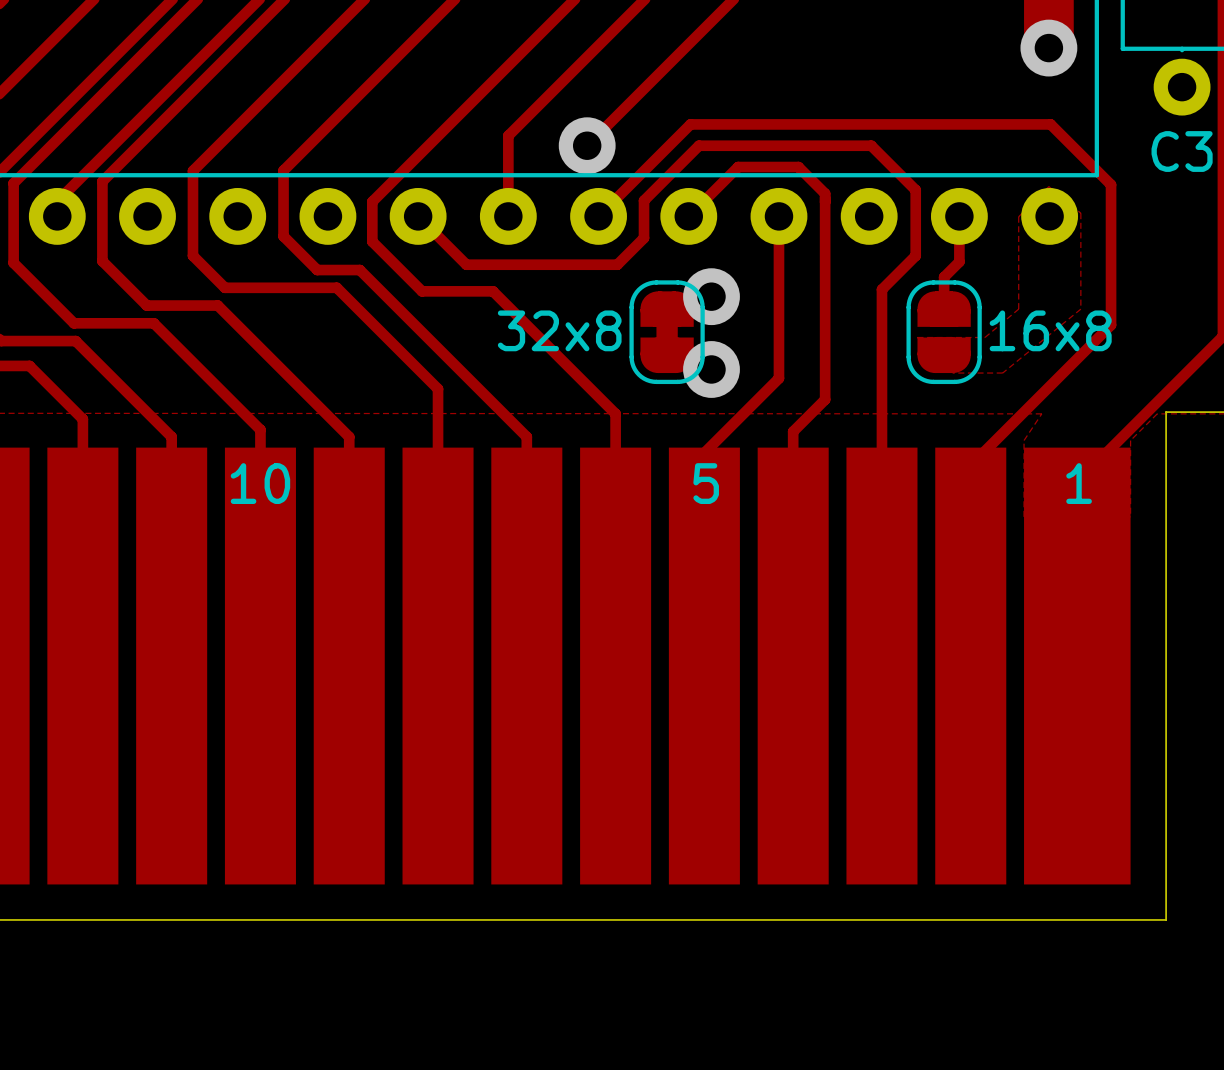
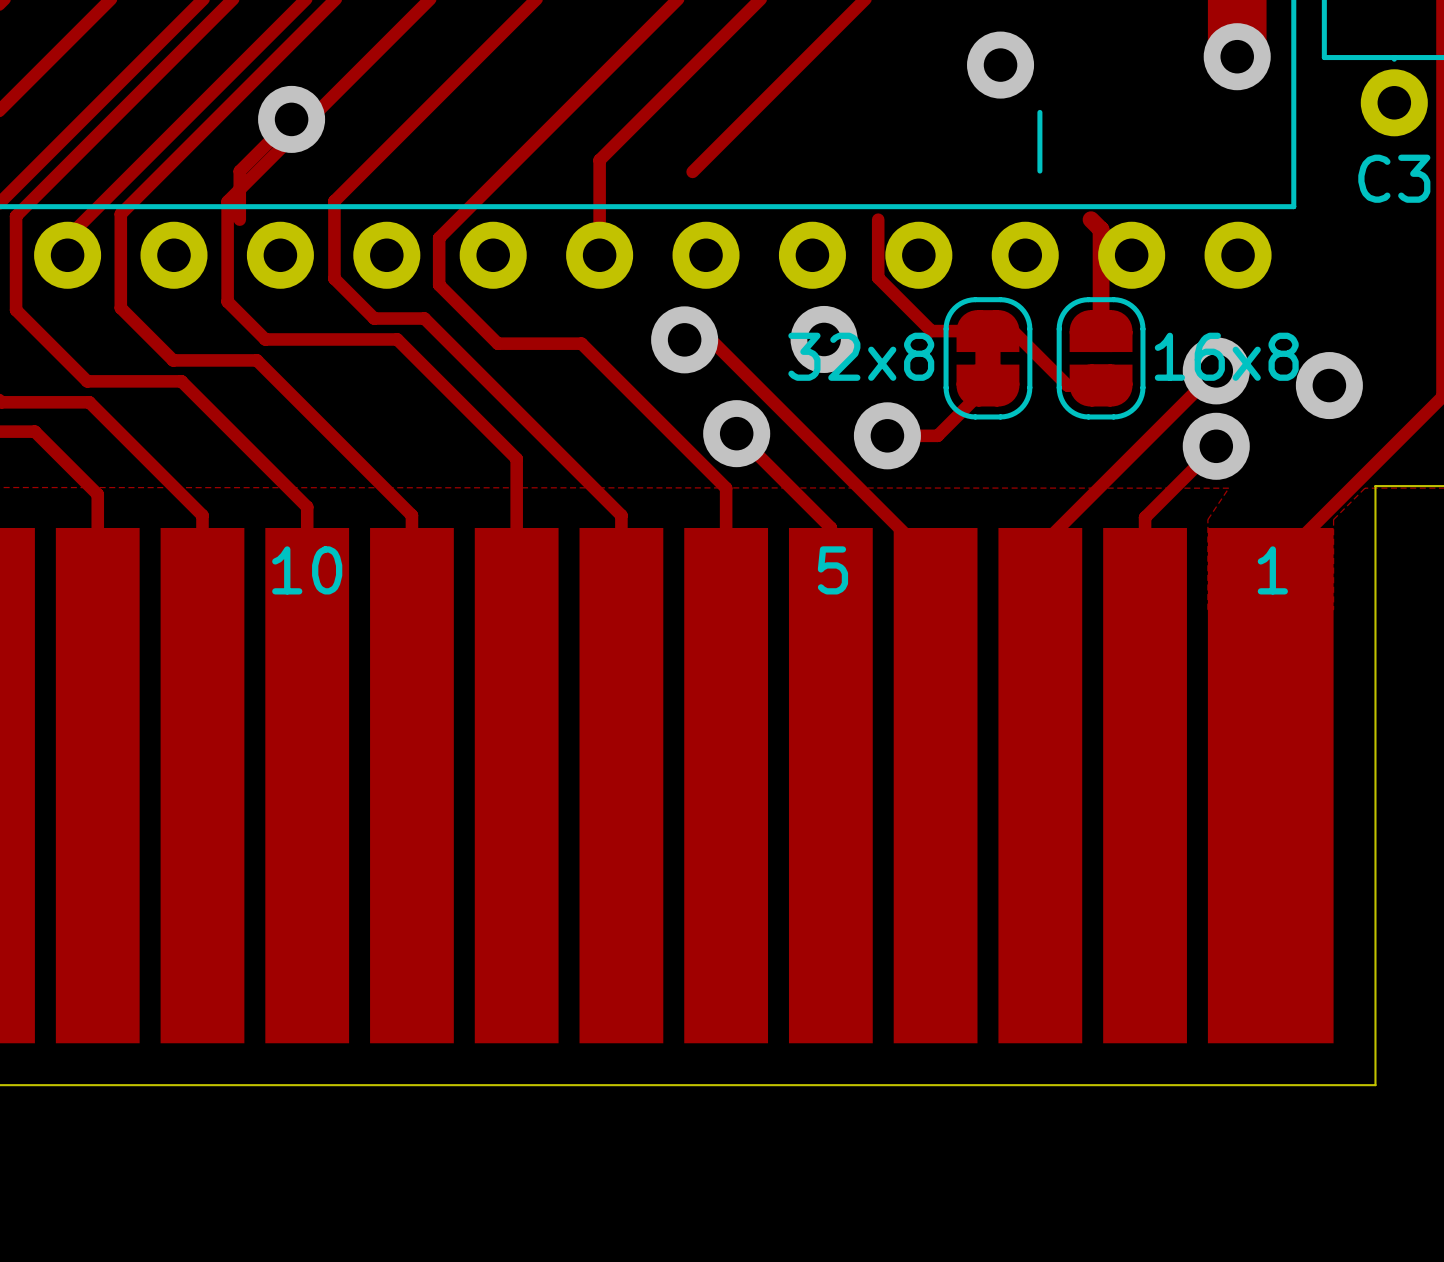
via: none -> (1000, 65)
line: none -> (1039, 112) (1039, 171)
track: none -> (291, 119) (239, 171) (239, 219)
via: none -> (291, 119)
via: (587, 145) -> none
track: none -> (878, 219) (878, 277) (931, 331) (1013, 331) (1067, 385) (1101, 385)
track: none -> (1091, 219) (1101, 229) (1101, 331) (1096, 331)
zone outline: (1048, 186) (1018, 216) (1018, 309) (984, 337) (917, 337) (953, 373) (1002, 373) (1080, 309) (1080, 213) (1048, 186) -> none
track: (418, 216) (466, 264) (617, 264) (644, 238) (644, 200) (698, 145) (871, 145) (915, 190) (915, 255) (881, 289) (881, 463) -> (1216, 370) (1040, 546)
track: (598, 216) (690, 124) (1050, 124) (1111, 184) (1111, 325) (970, 465) -> (1216, 446) (1145, 517) (1145, 548)
track: (688, 216) (738, 167) (798, 167) (825, 193) (825, 399) (793, 431) (793, 478) -> (684, 339) (711, 339) (935, 564)
track: (778, 216) (778, 378) (704, 452) -> (736, 433) (830, 527) (830, 534)
track: (959, 216) (959, 261) (944, 277) (944, 309) -> none
via: none -> (684, 339)
via position: (711, 296) -> (824, 339)
via: none -> (1216, 370)
track: none -> (987, 385) (937, 435) (887, 435)
via: none -> (1329, 385)
part position: (667, 332) -> (987, 358)
part position: (944, 332) -> (1101, 358)
via: none -> (736, 433)
via position: (711, 369) -> (887, 435)
via: none -> (1216, 446)

